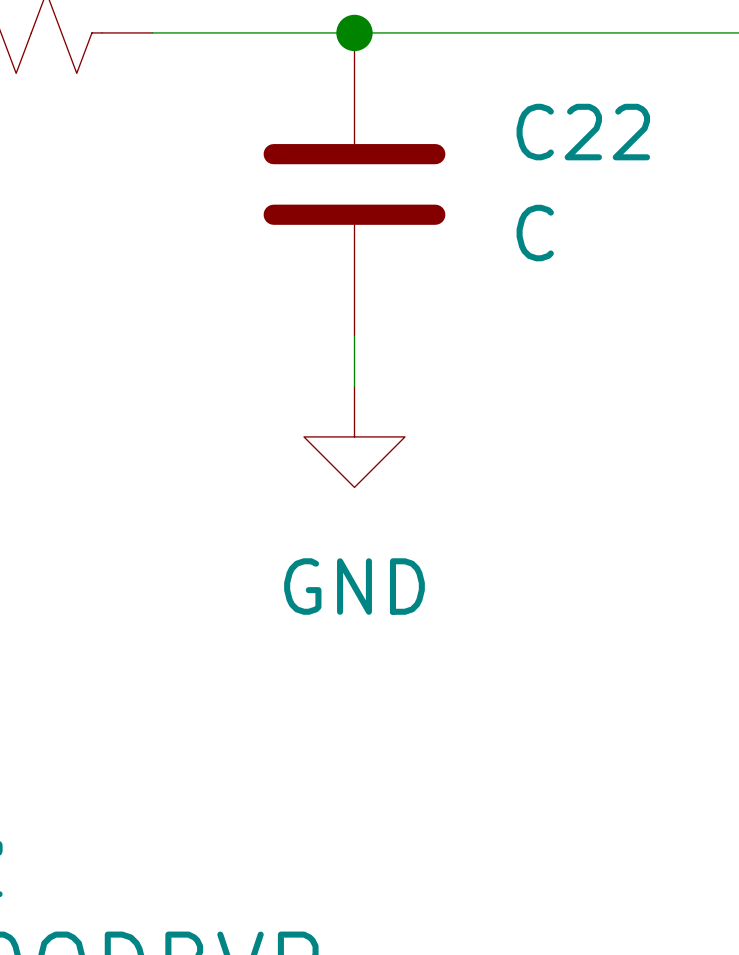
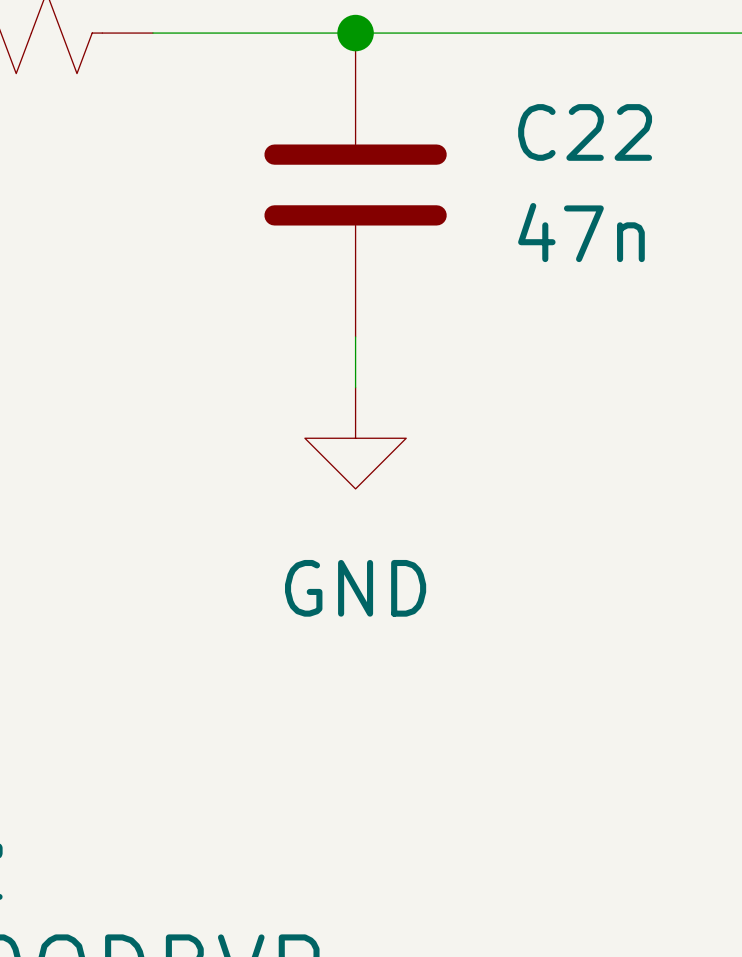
C22 value: C (535, 233) -> 47n (581, 232)

